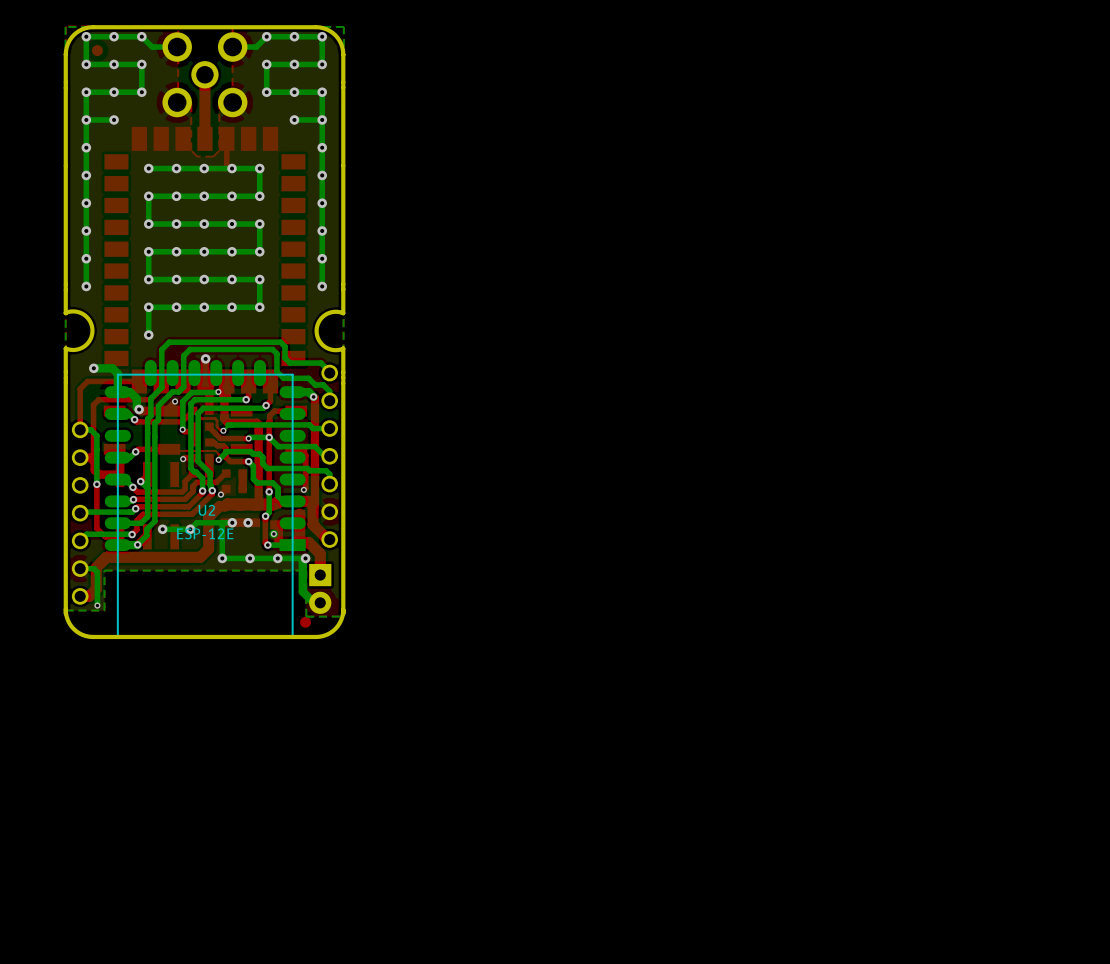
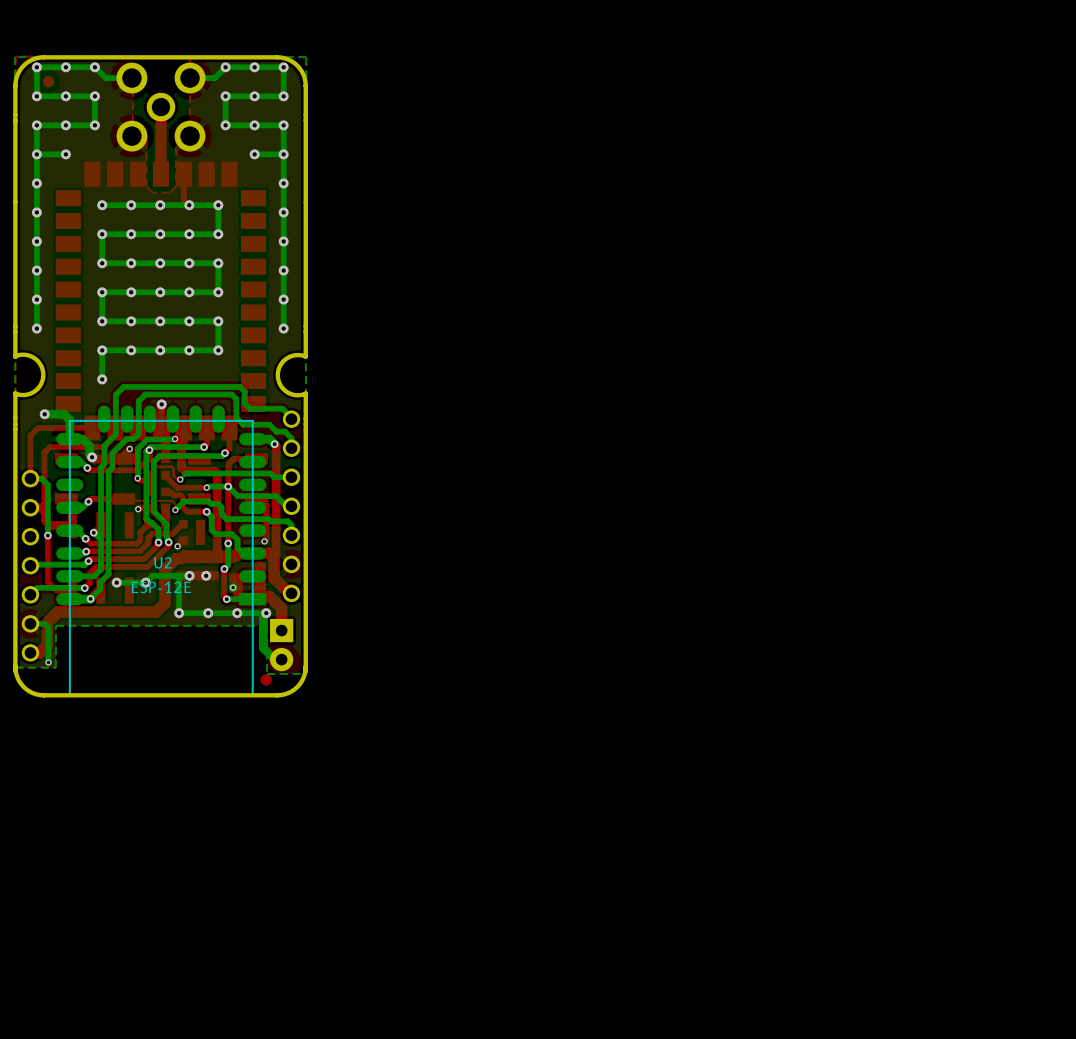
via: none -> (149, 450)

